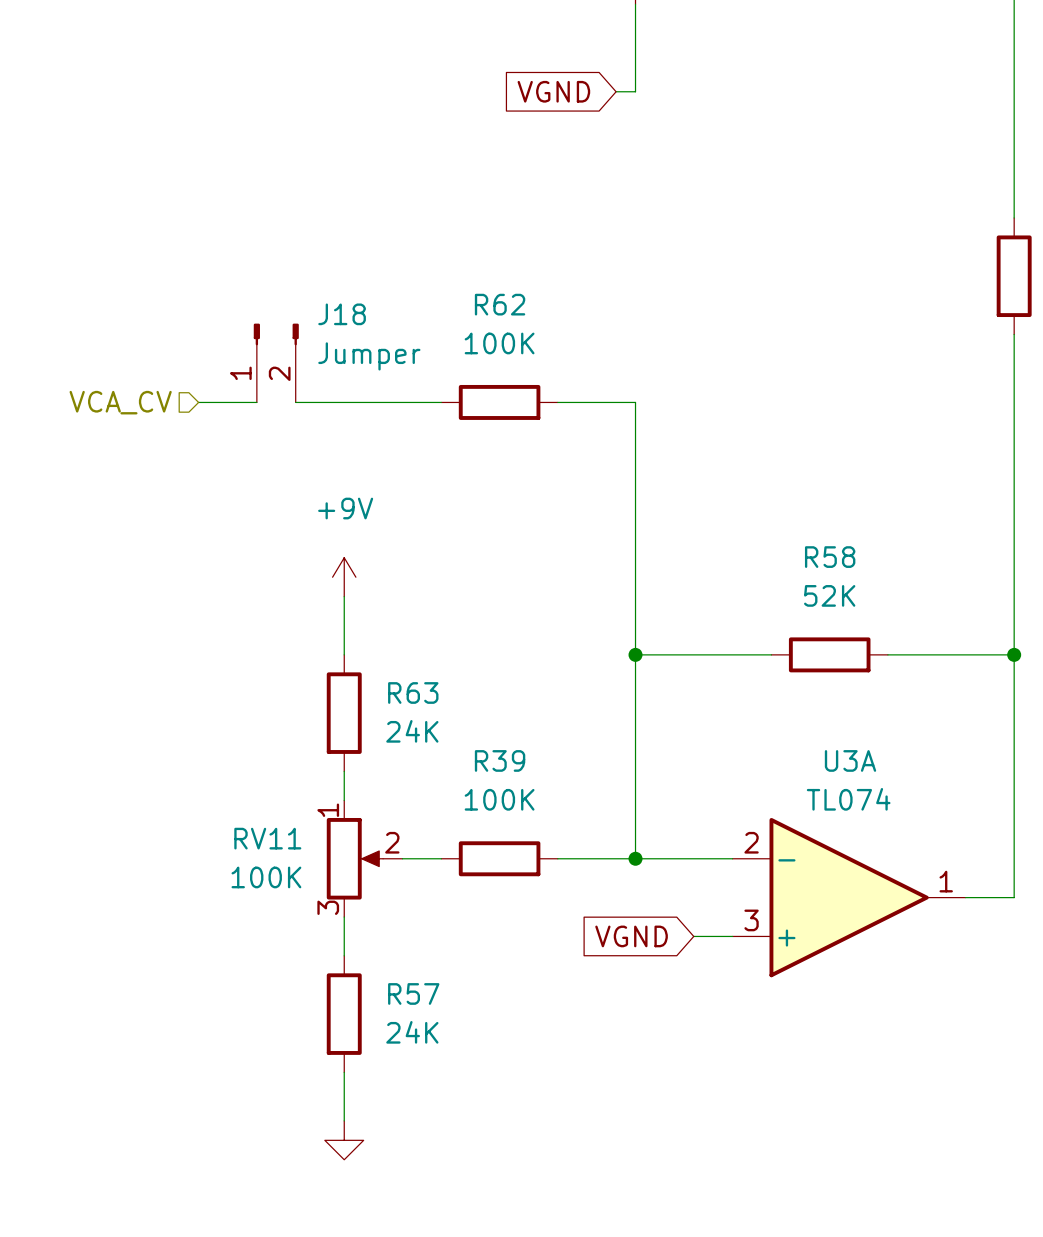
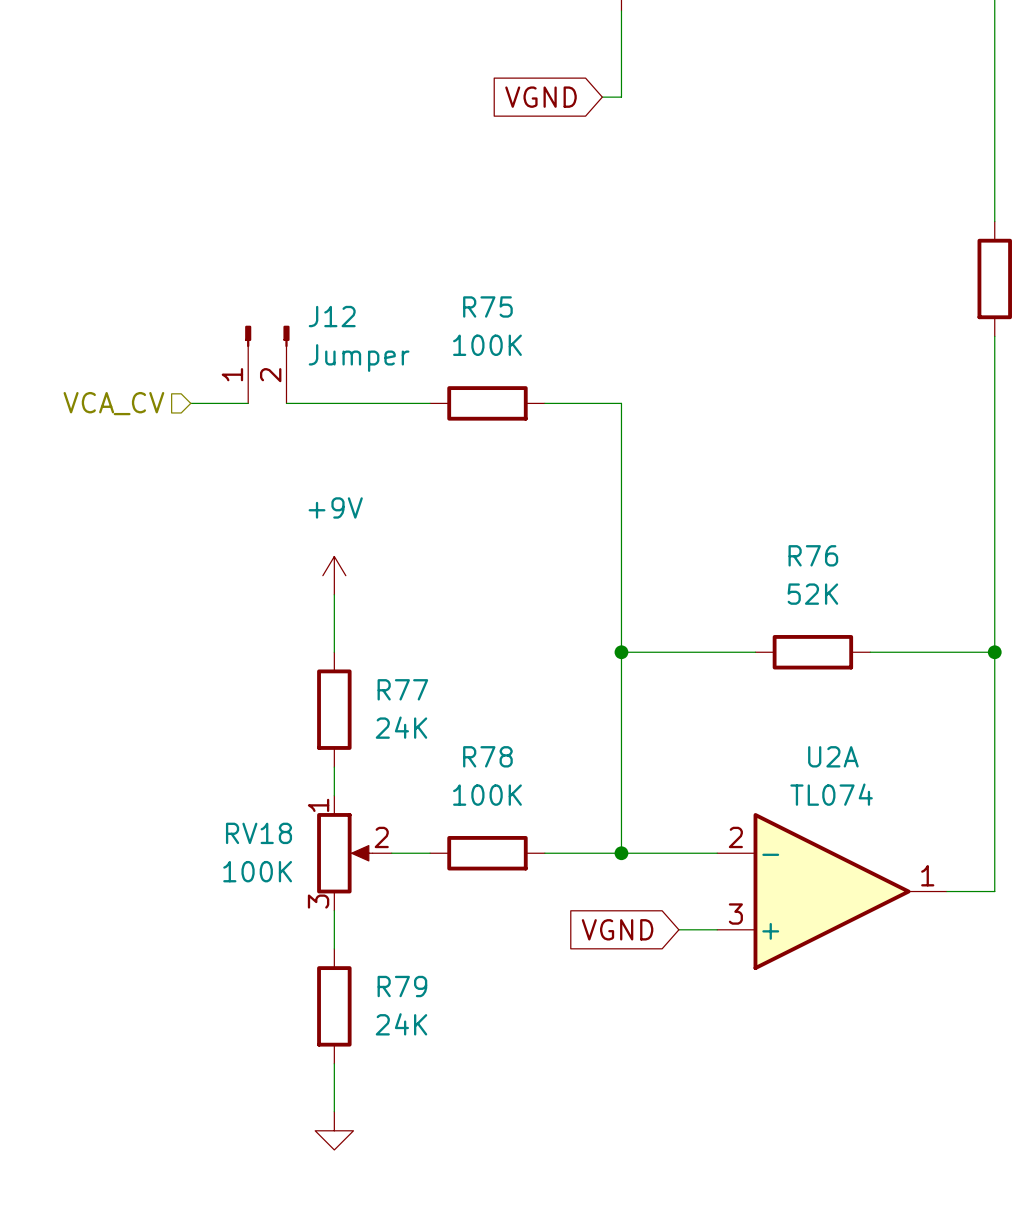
R62 name: R62 (500, 304) -> R75 (487, 306)
J18 name: J18 (342, 314) -> J12 (332, 316)
R58 name: R58 (830, 557) -> R76 (813, 555)
R63 name: R63 (413, 692) -> R77 (402, 689)
R39 name: R39 (500, 760) -> R78 (487, 756)
U3A name: U3A (850, 760) -> U2A (833, 756)
RV11 name: RV11 (267, 838) -> RV18 (259, 833)
R57 name: R57 (413, 993) -> R79 (402, 986)

